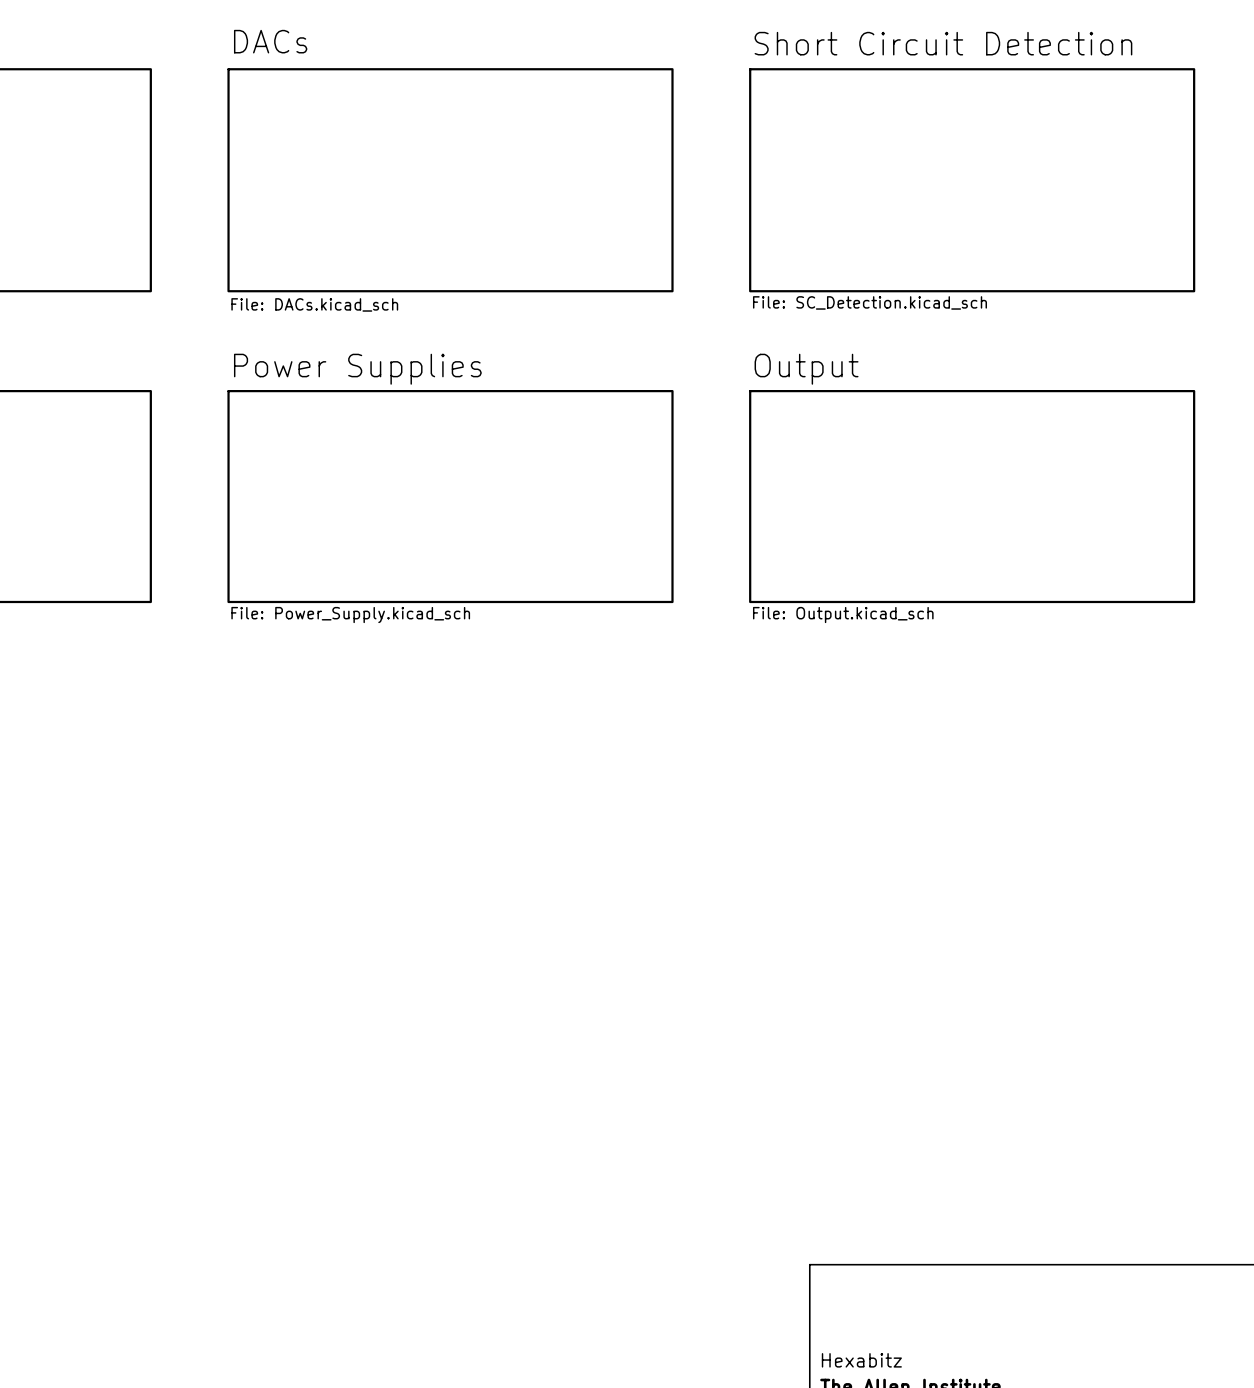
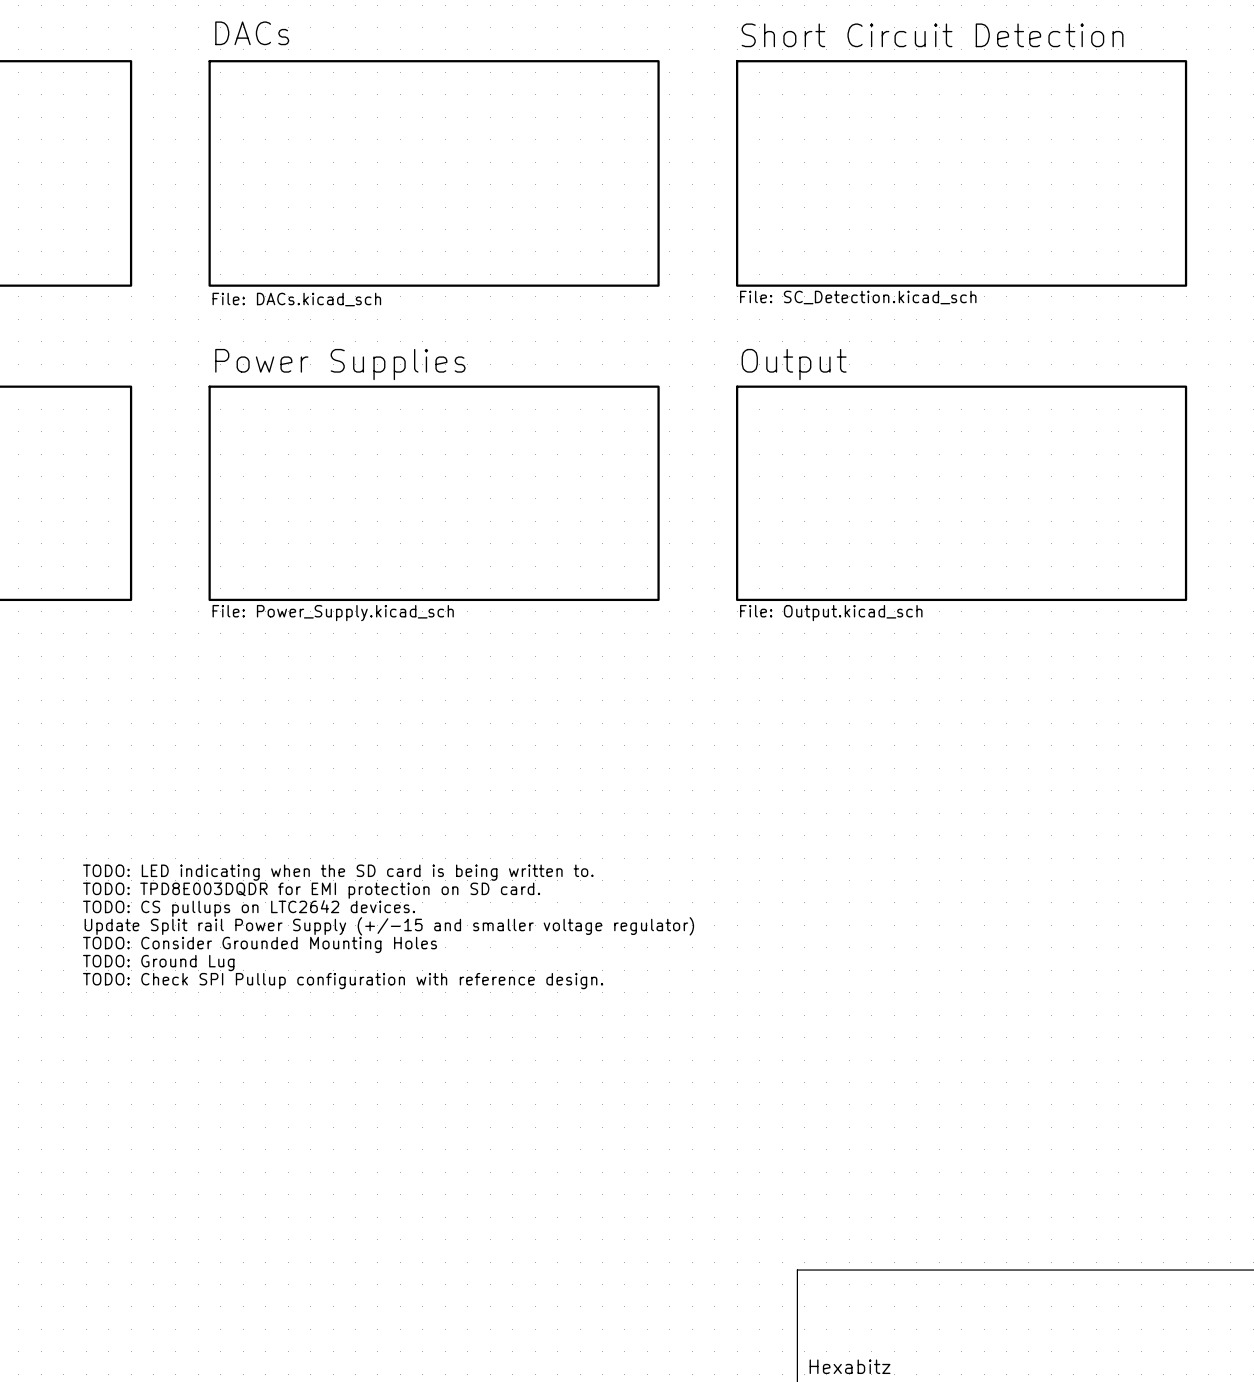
text: none -> TODO: LED indicating when the SD card is being written to. (338, 872)
text: none -> TODO: TPD8E003DQDR for EMI protection on SD card. (311, 890)
text: none -> TODO: CS pullups on LTC2642 devices. (249, 908)
text: none -> Update Split rail Power Supply (+/-15 and smaller voltage regulator) (389, 926)
text: none -> TODO: Consider Grounded Mounting Holes (260, 944)
text: none -> TODO: Ground Lug (158, 963)
text: none -> TODO: Check SPI Pullup configuration with reference design. (343, 981)

